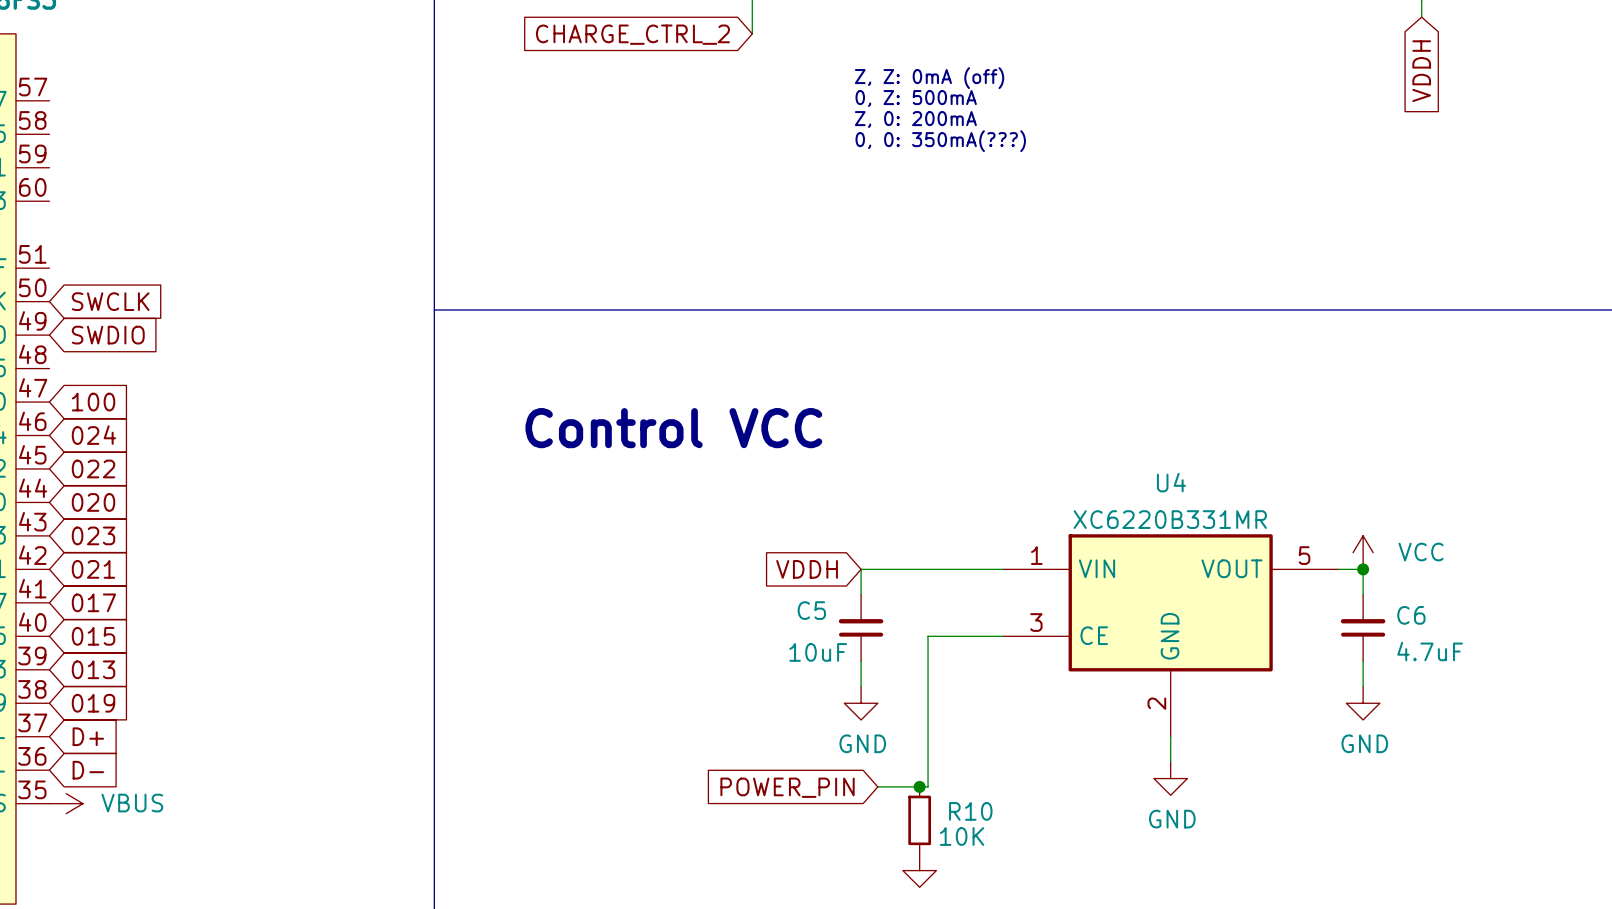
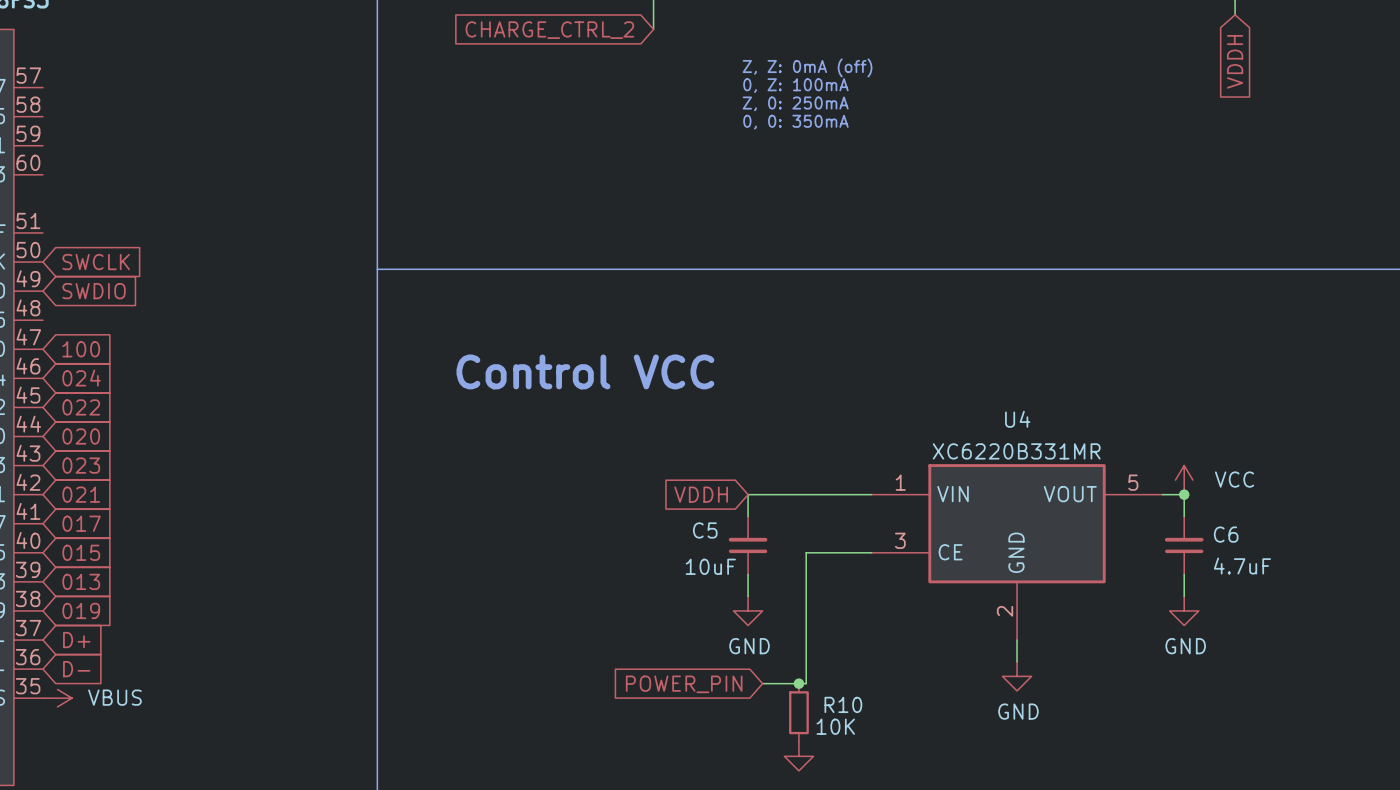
text: 0, Z: 500mA (916, 98) -> 0, Z: 100mA (795, 85)
text: Z, 0: 200mA (915, 119) -> Z, 0: 250mA (795, 103)
text: 0, 0: 350mA(???) (940, 141) -> 0, 0: 350mA (795, 122)

